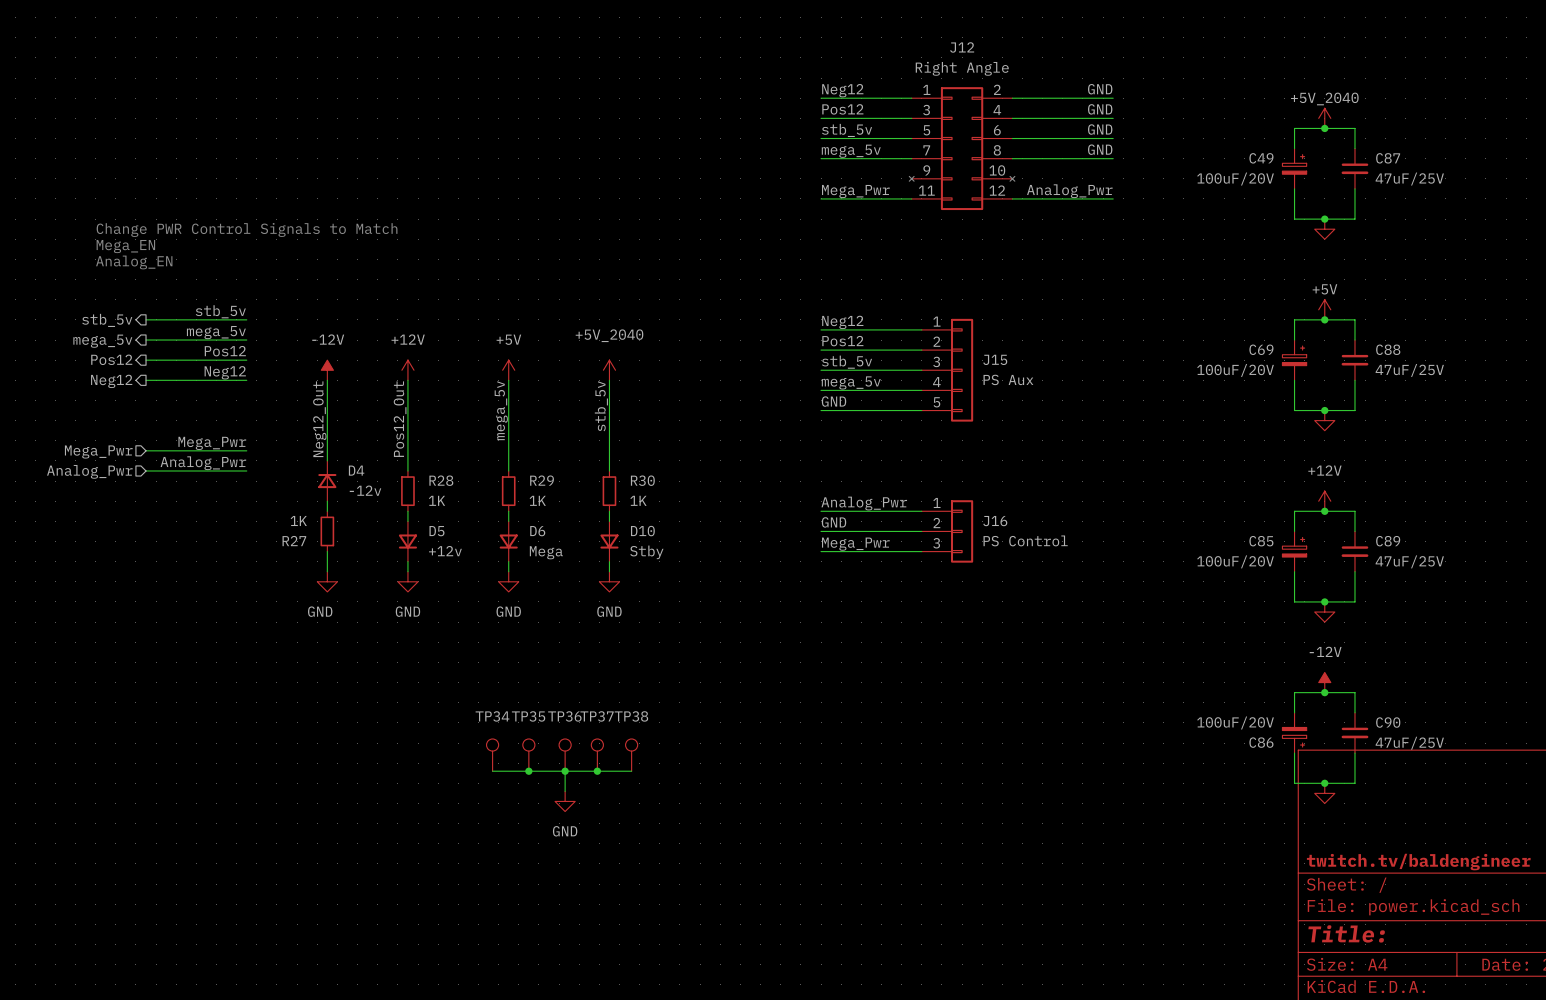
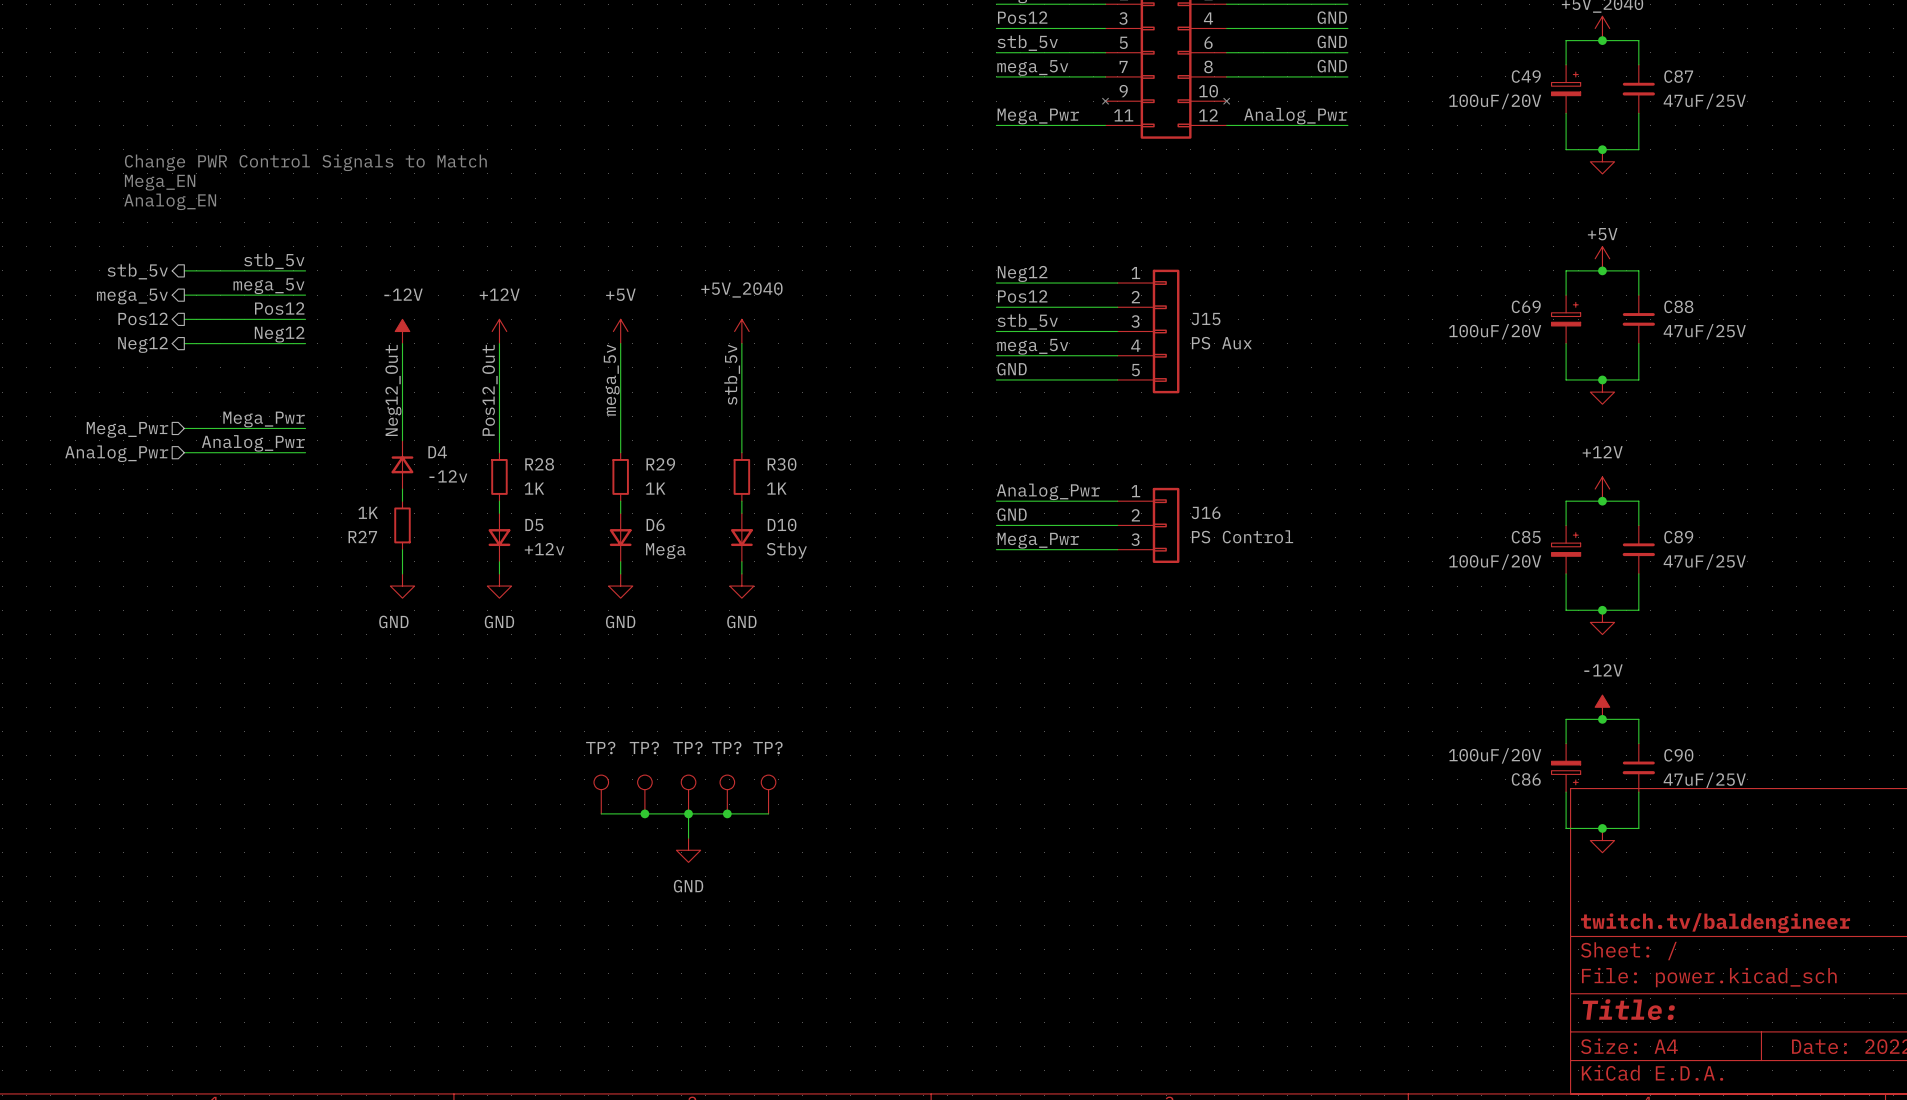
TP34 name: TP34 (492, 716) -> TP? (600, 747)
TP35 name: TP35 (528, 716) -> TP? (644, 747)
TP36 name: TP36 (564, 716) -> TP? (687, 747)
TP37 name: TP37 (597, 716) -> TP? (726, 747)
TP38 name: TP38 (631, 716) -> TP? (767, 747)

